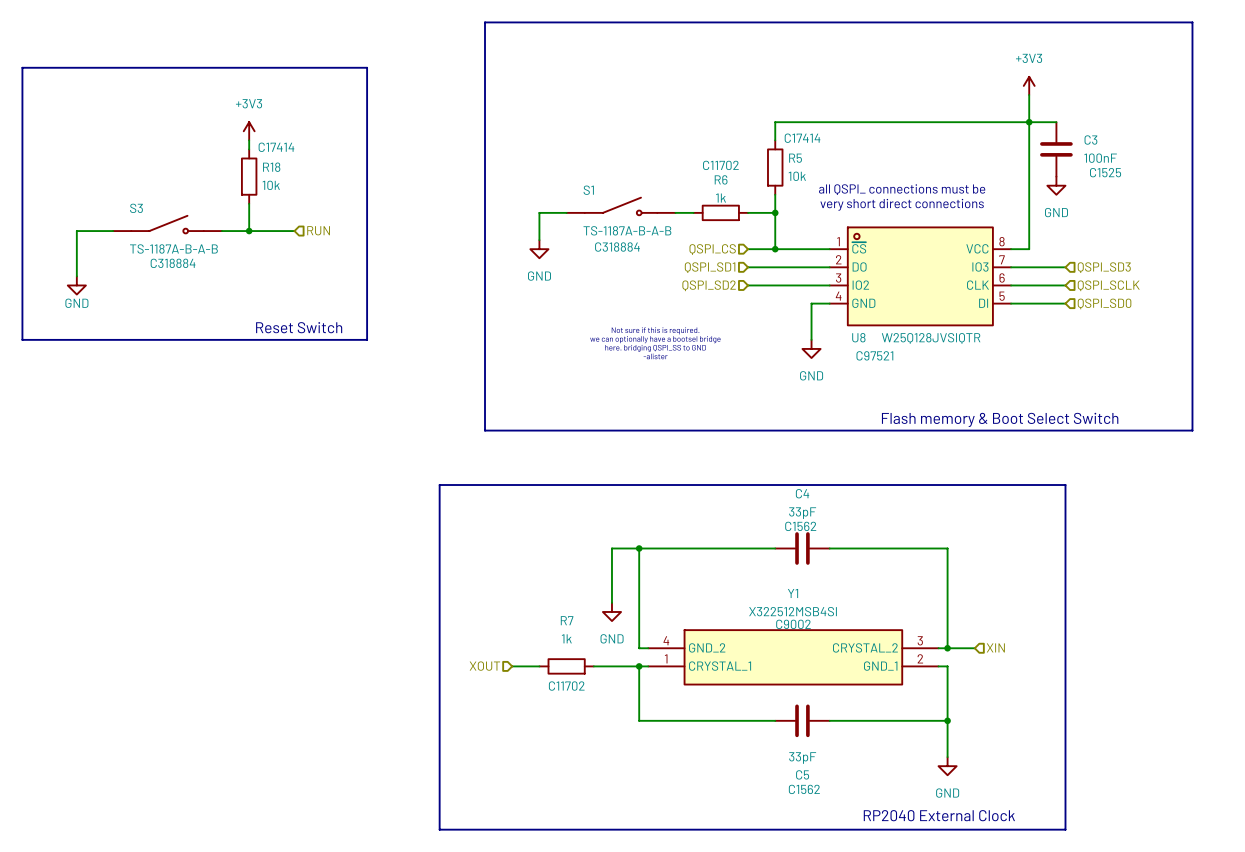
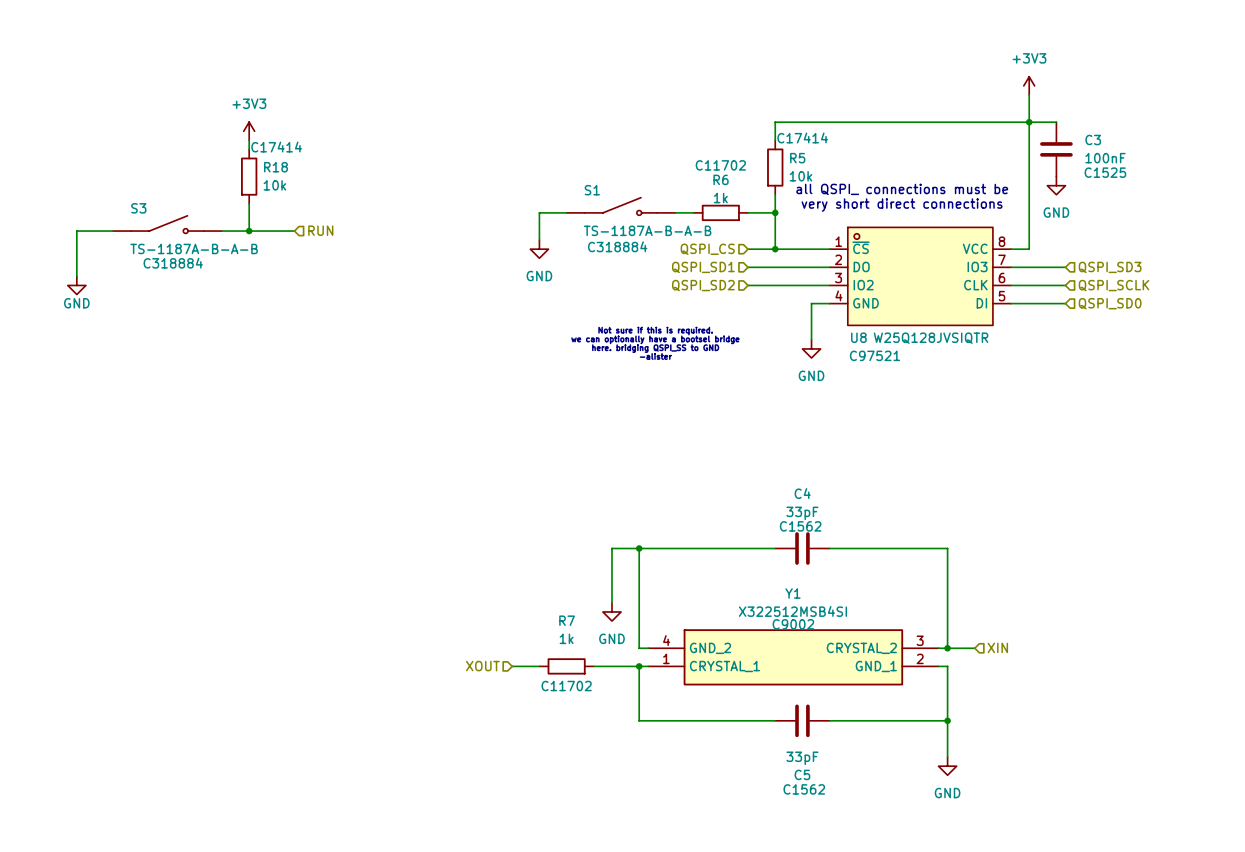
line: (485, 22) (1192, 22) (1192, 430) (485, 430) (485, 22) -> none
line: (22, 67) (367, 67) (367, 339) (22, 339) (22, 67) -> none
text: Reset Switch (299, 327) -> none
text: Flash memory & Boot Select Switch (1000, 419) -> none
line: (439, 485) (1065, 485) (1065, 829) (439, 829) (439, 485) -> none
text: RP2040 External Clock (939, 815) -> none

